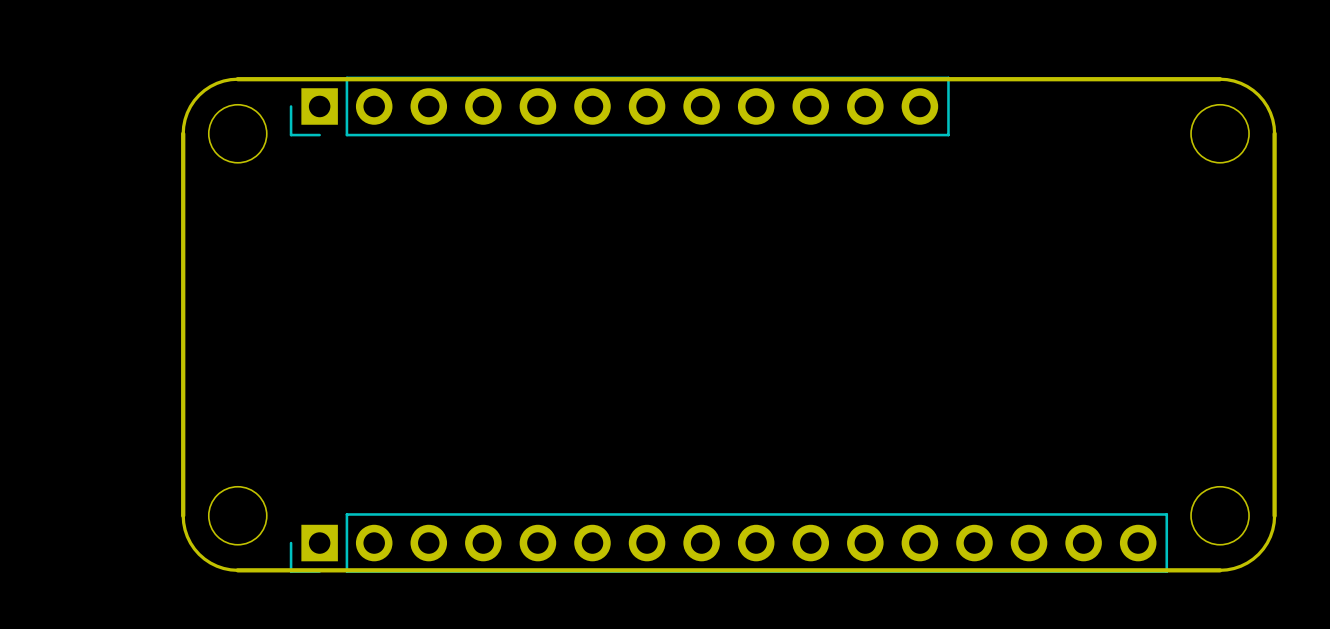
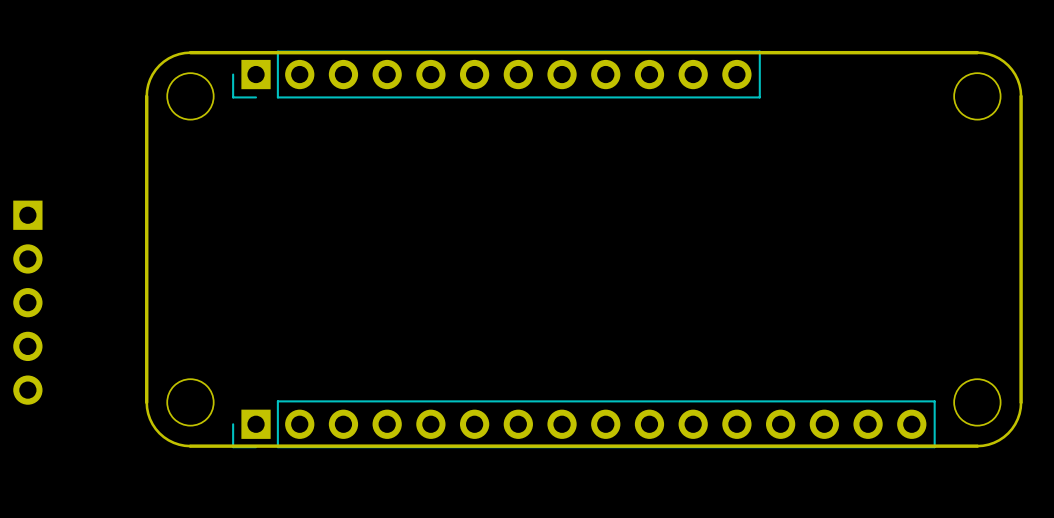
part: none -> (27, 302)

